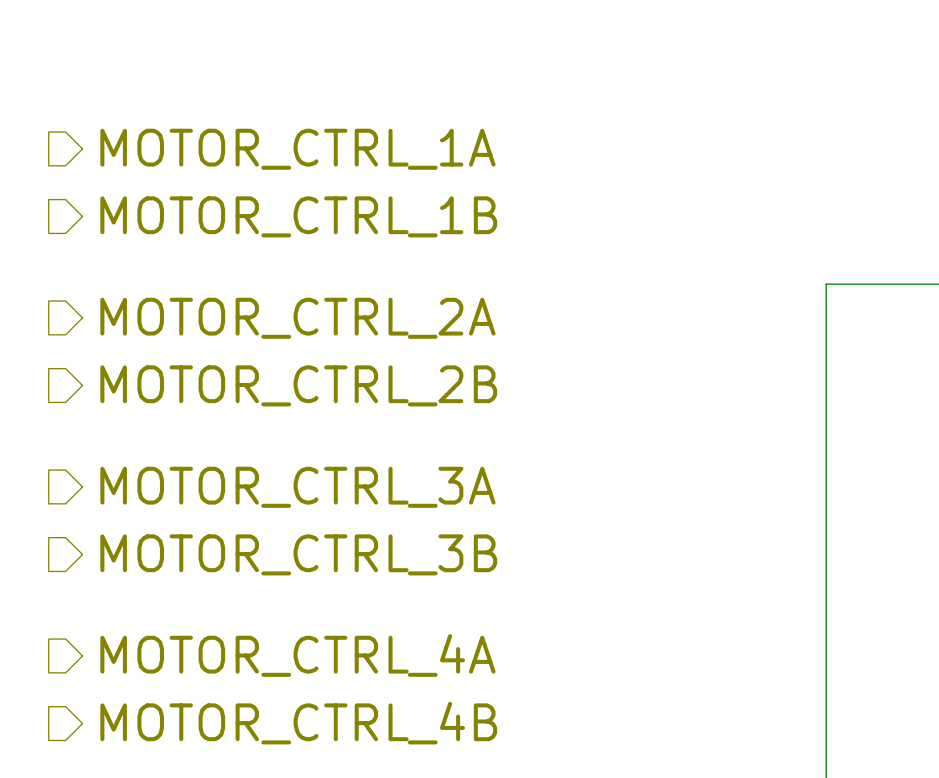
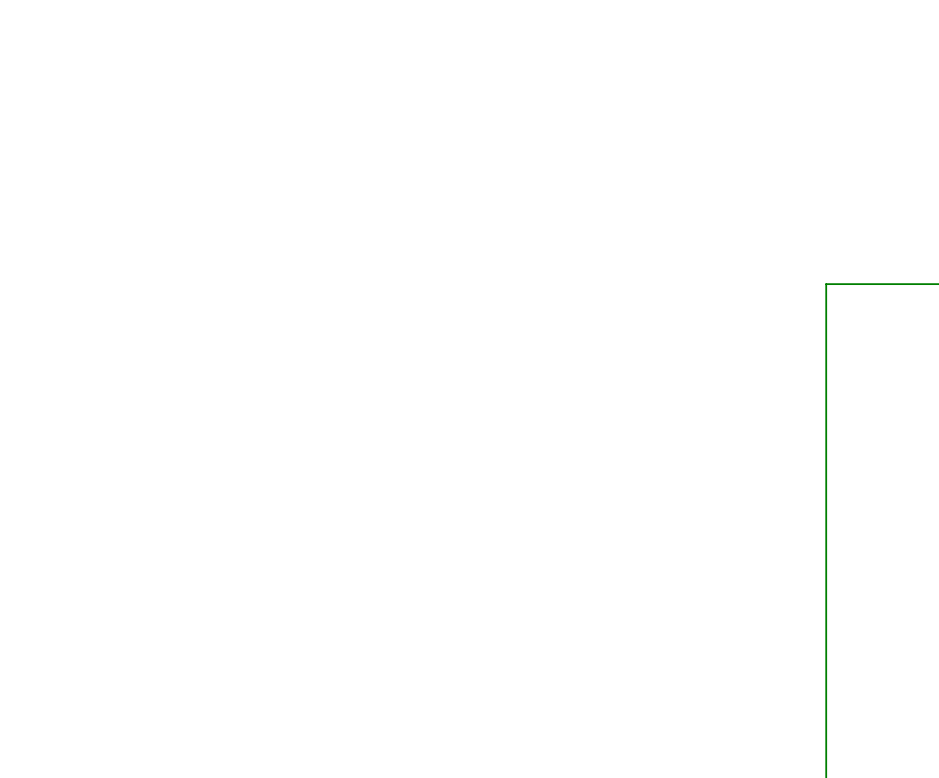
hierarchical label: MOTOR_CTRL_1A (297, 149) -> none
hierarchical label: MOTOR_CTRL_1B (298, 216) -> none
hierarchical label: MOTOR_CTRL_2A (297, 318) -> none
hierarchical label: MOTOR_CTRL_2B (298, 385) -> none
hierarchical label: MOTOR_CTRL_3A (297, 487) -> none
hierarchical label: MOTOR_CTRL_3B (298, 554) -> none
hierarchical label: MOTOR_CTRL_4A (297, 655) -> none
hierarchical label: MOTOR_CTRL_4B (298, 723) -> none

